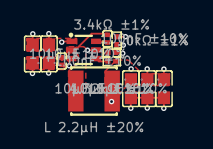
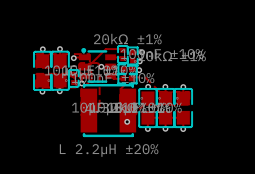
part value: 3.4kΩ ±1% (111, 24) -> 20kΩ ±1% (127, 39)

